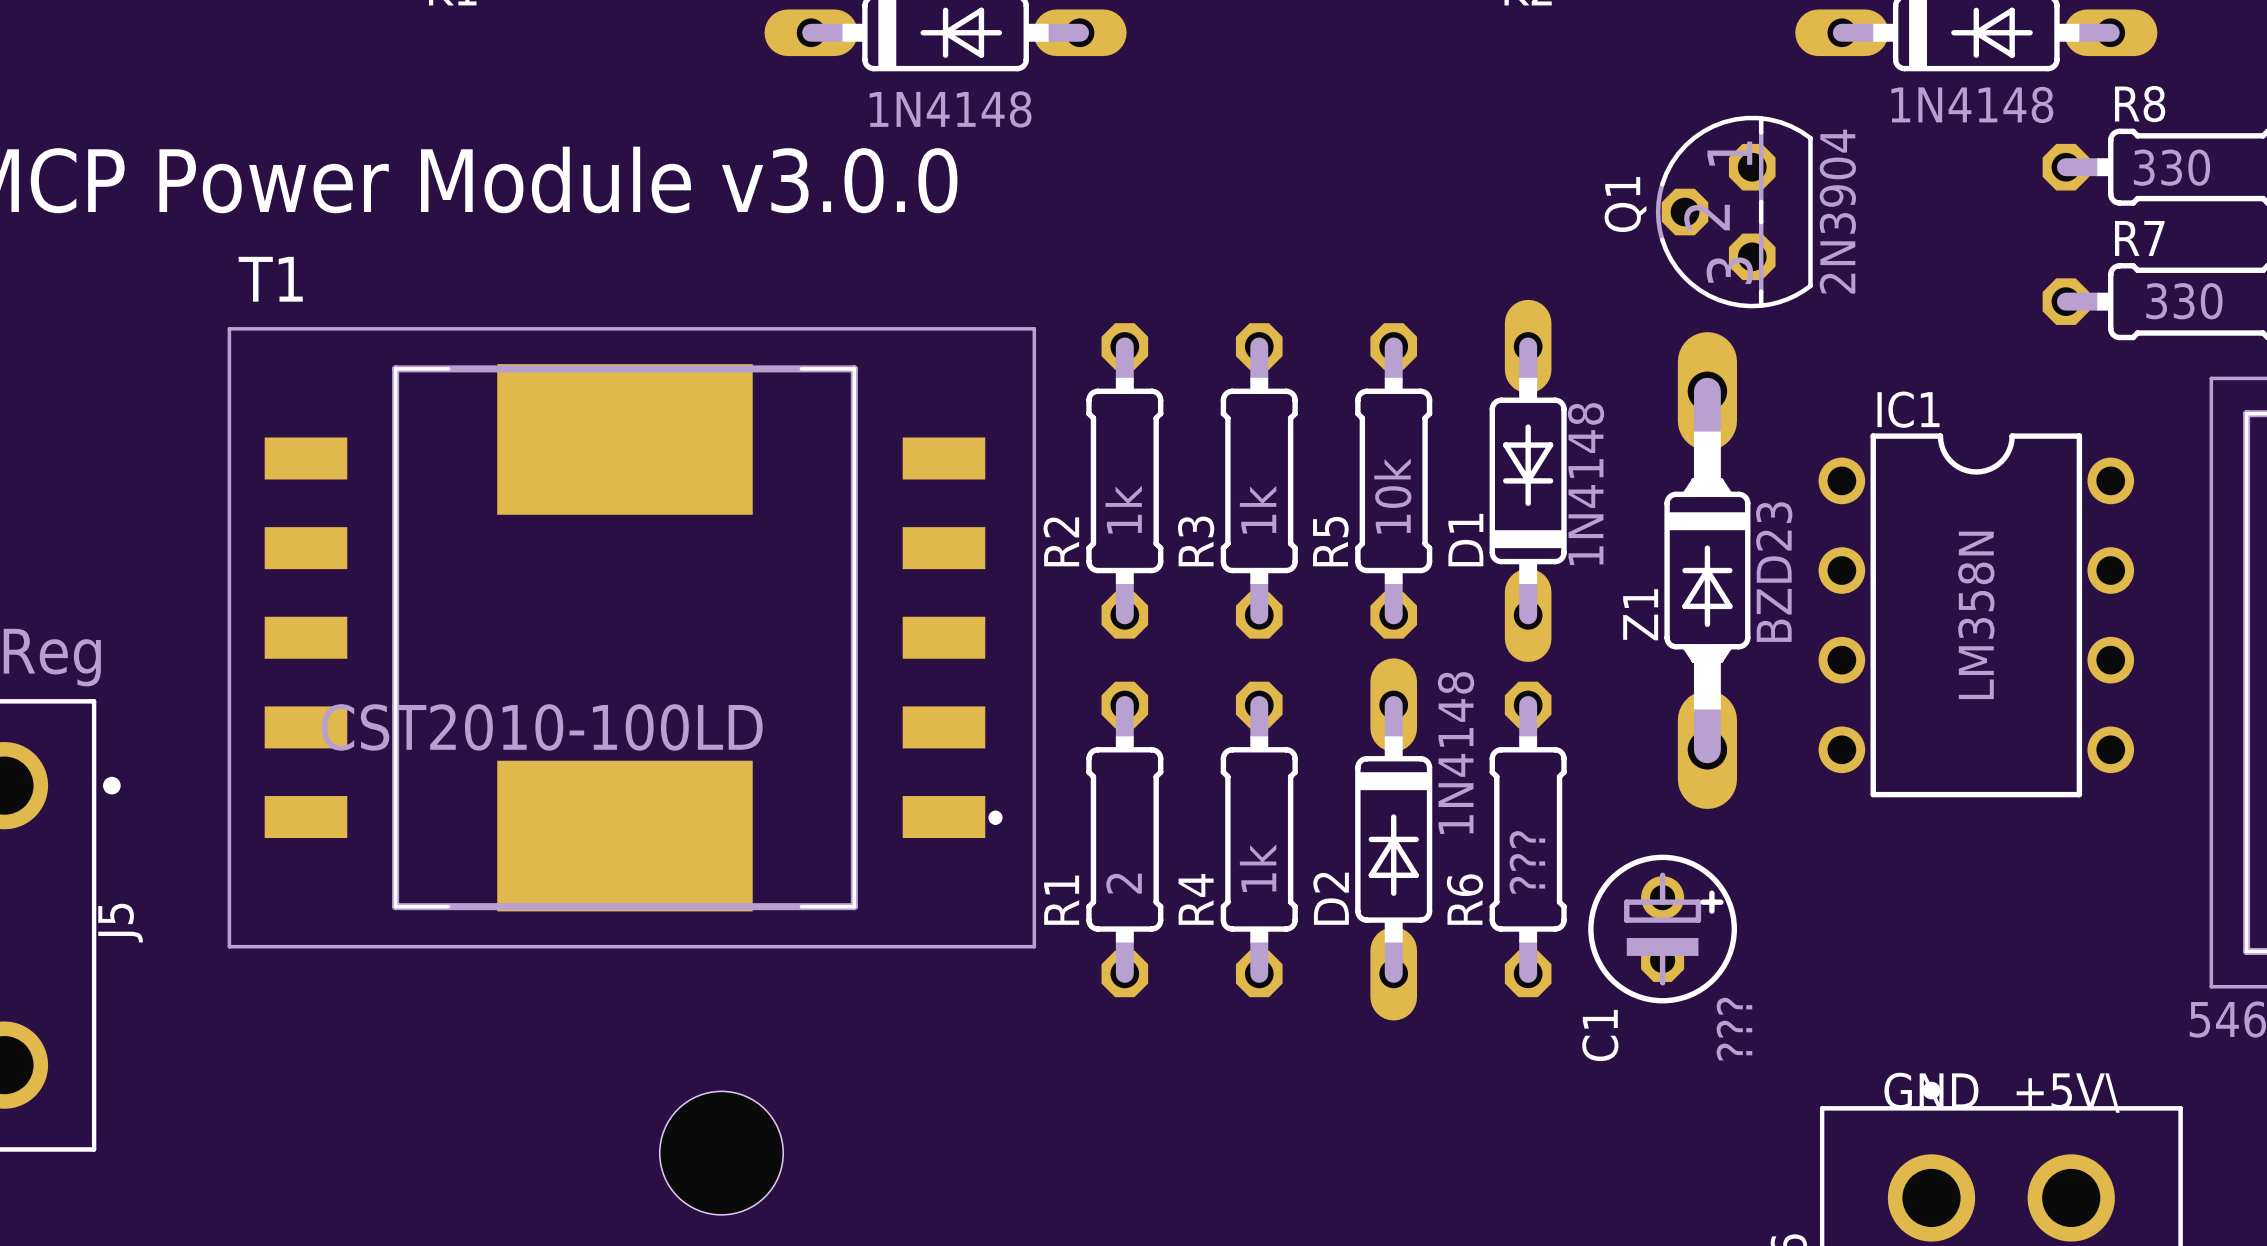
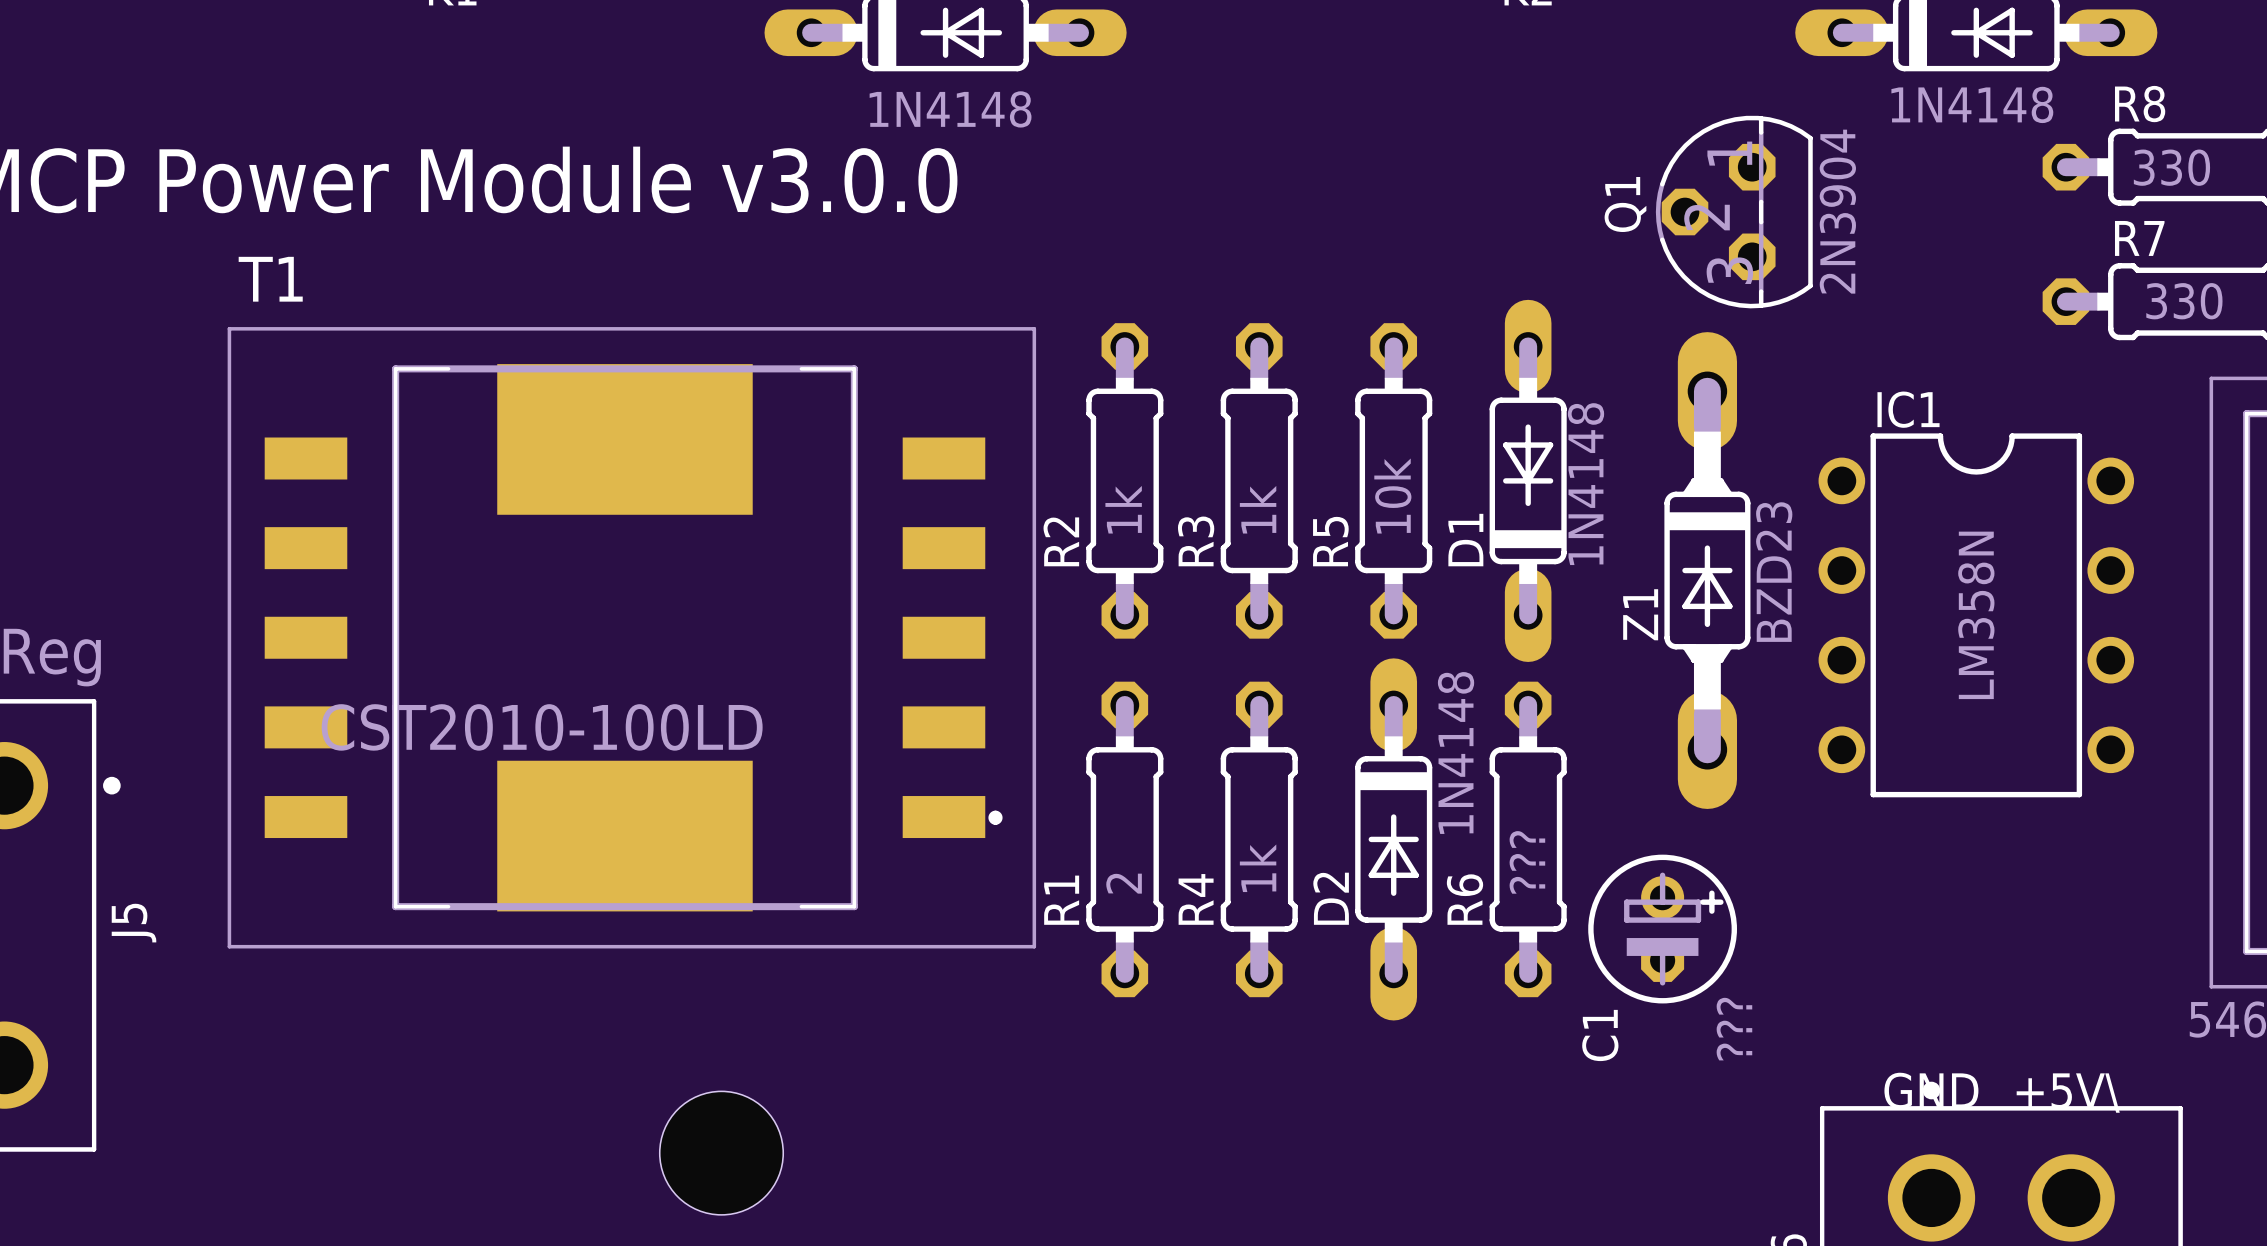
J5 name position: J5 (120, 923) -> J5 (134, 923)

